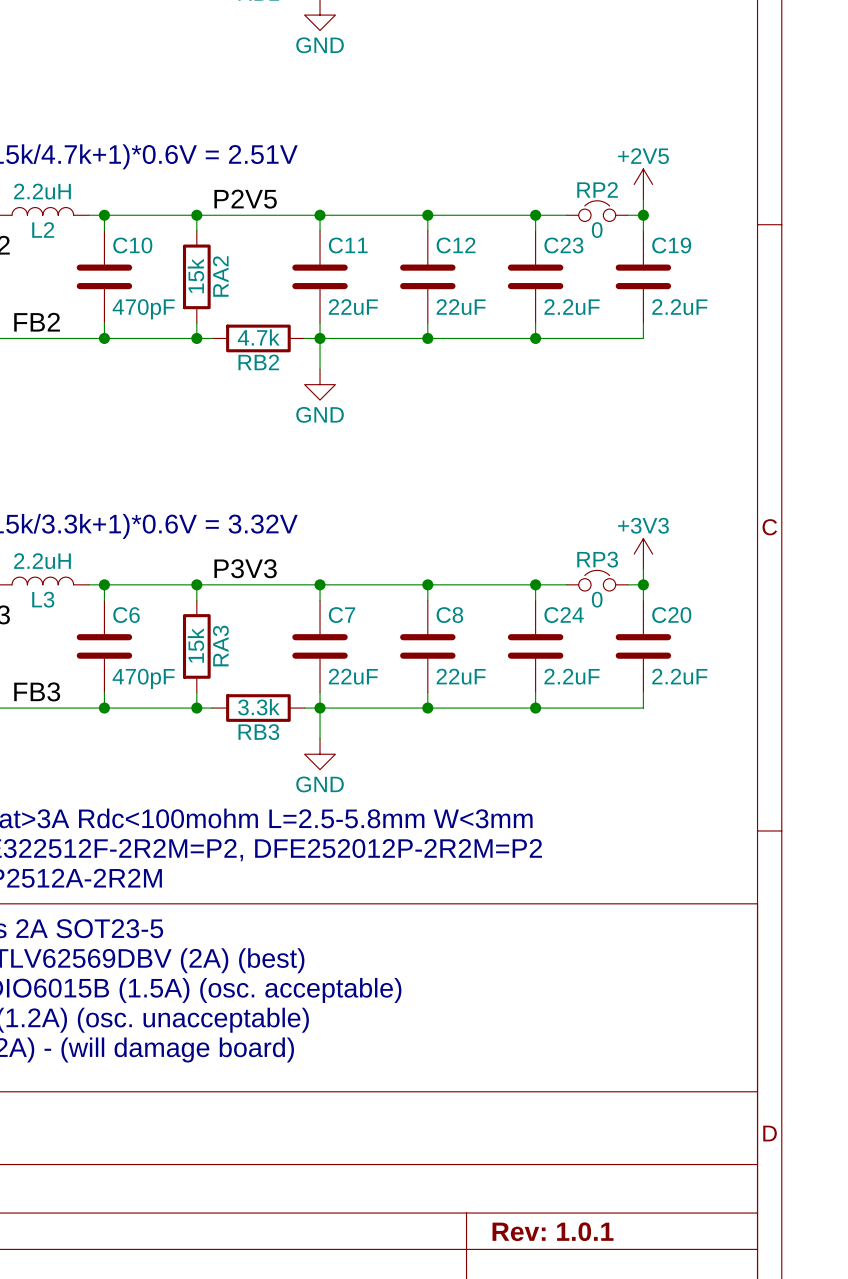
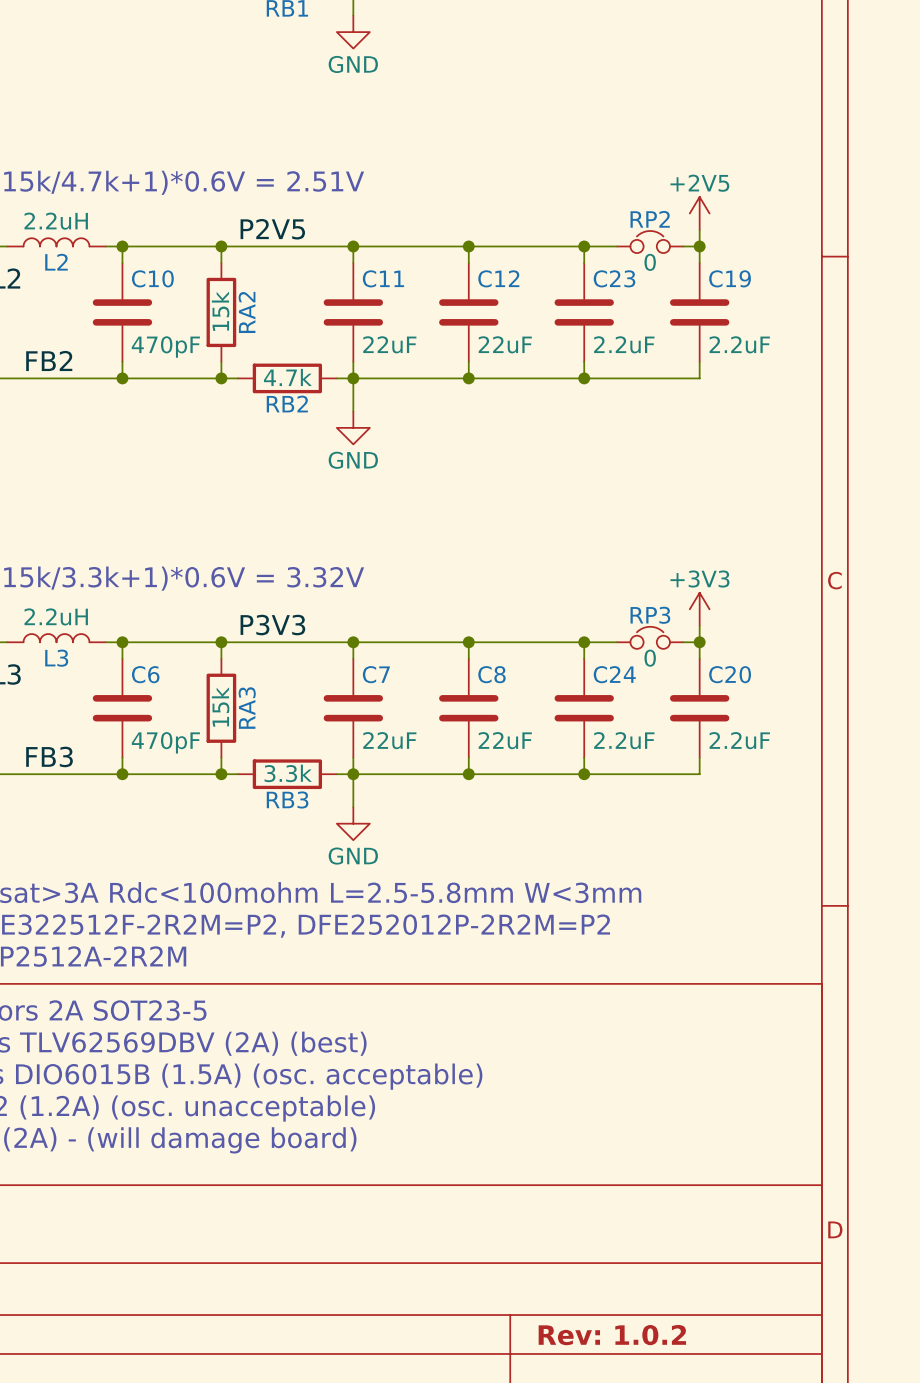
title block: Rev: 1.0.1 (553, 1231) -> Rev: 1.0.2 (612, 1335)

